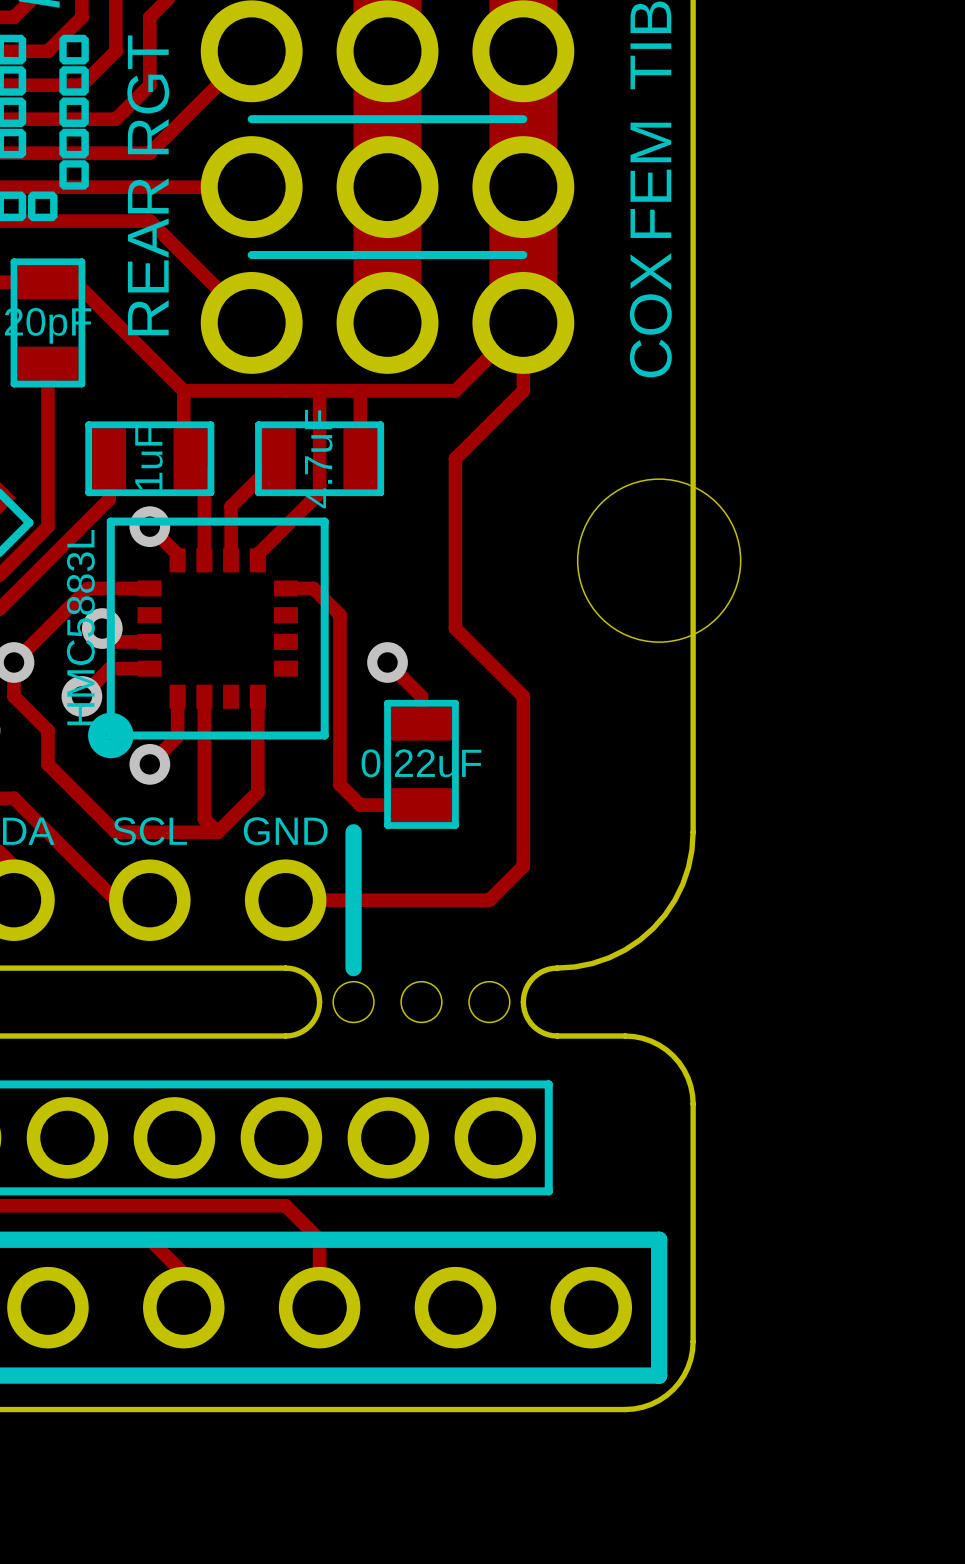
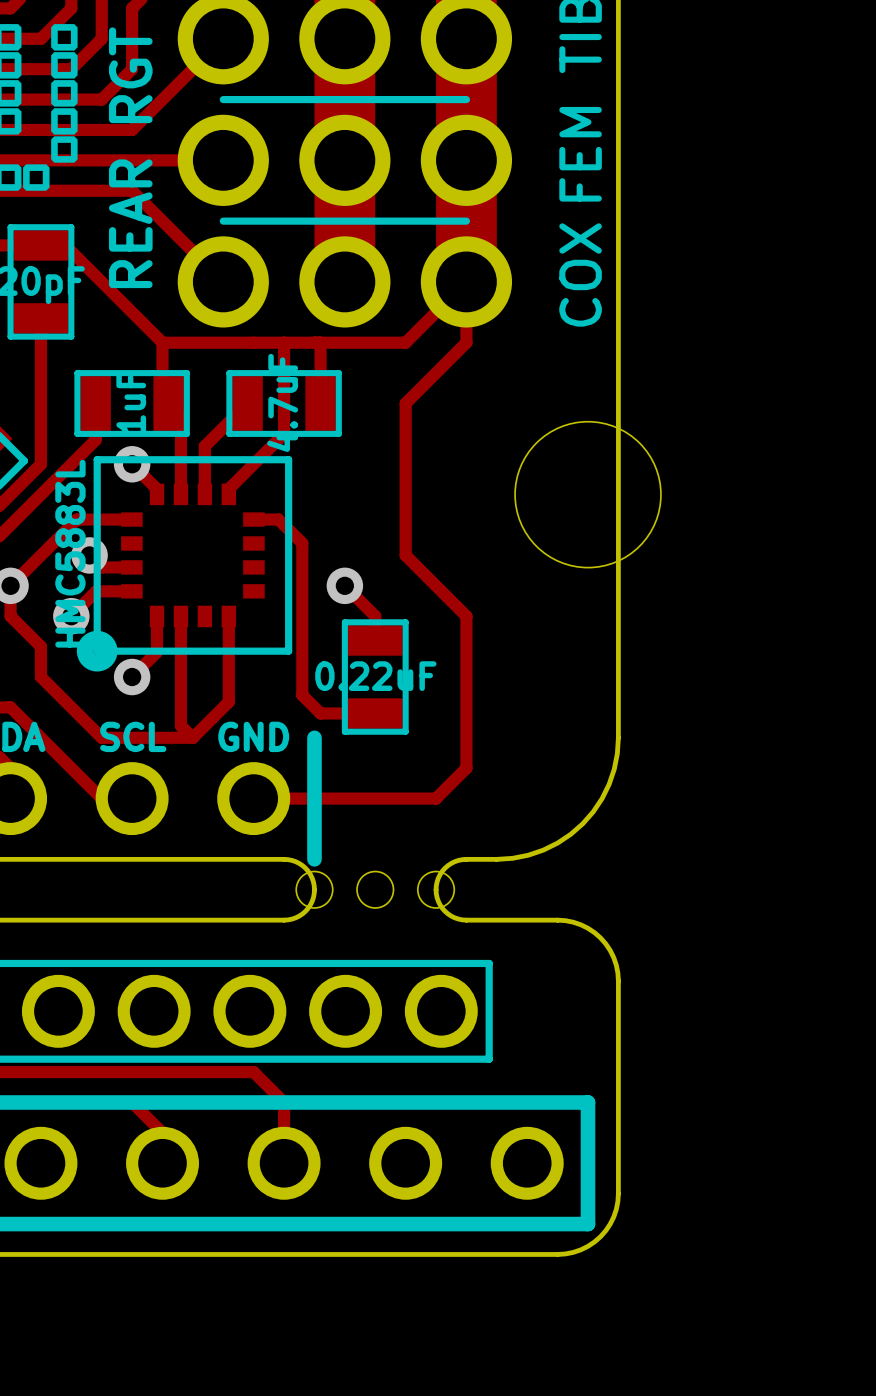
board edge: (285, 968) (298, 970) (309, 978) (317, 989) (319, 1002) -> (253, 859) (288, 859) (299, 863) (310, 874) (314, 889) (310, 904) (299, 916) (288, 919) (253, 920)
board edge: (557, 968) (544, 970) (533, 978) (525, 989) (523, 1002) -> (496, 859) (462, 859) (451, 863) (440, 874) (436, 889) (440, 904) (451, 916) (462, 919) (496, 920)
board edge: (319, 1002) (317, 1015) (309, 1026) (298, 1033) (285, 1036) -> none
board edge: (523, 1002) (525, 1015) (533, 1026) (544, 1033) (557, 1036) -> none

